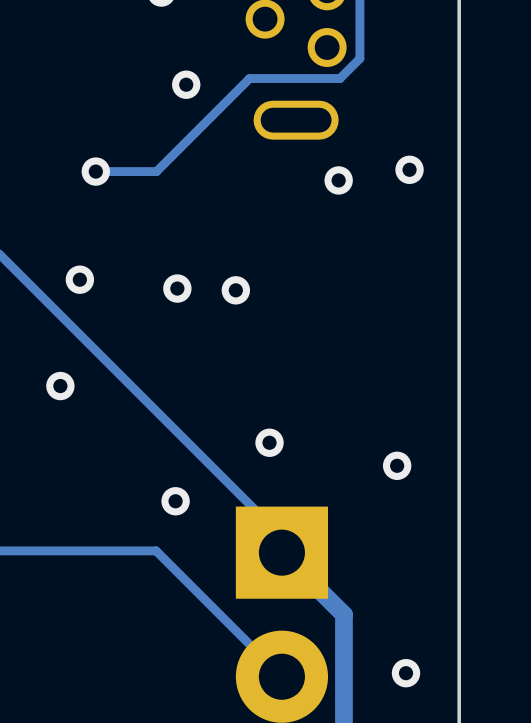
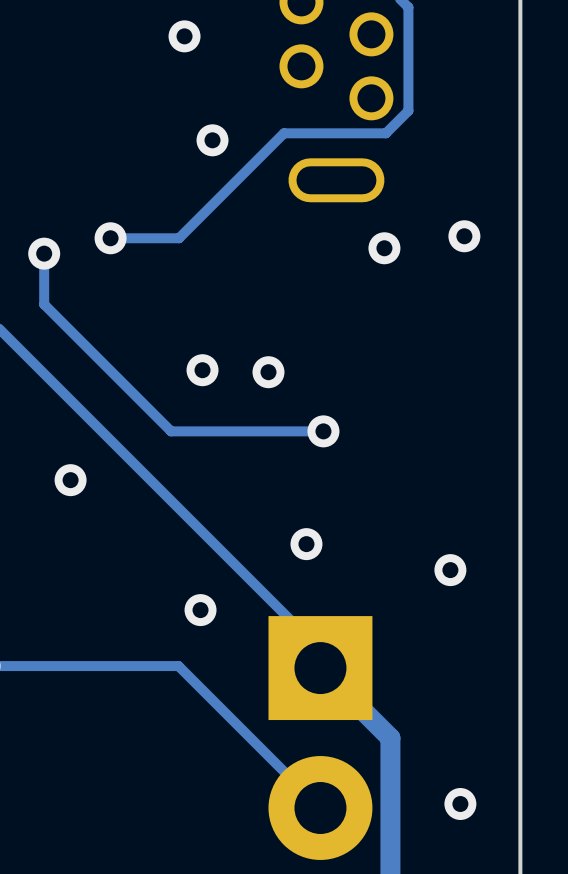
track: none -> (44, 253) (44, 304) (171, 431) (323, 431)
via position: (79, 279) -> (44, 253)
via: none -> (323, 431)

